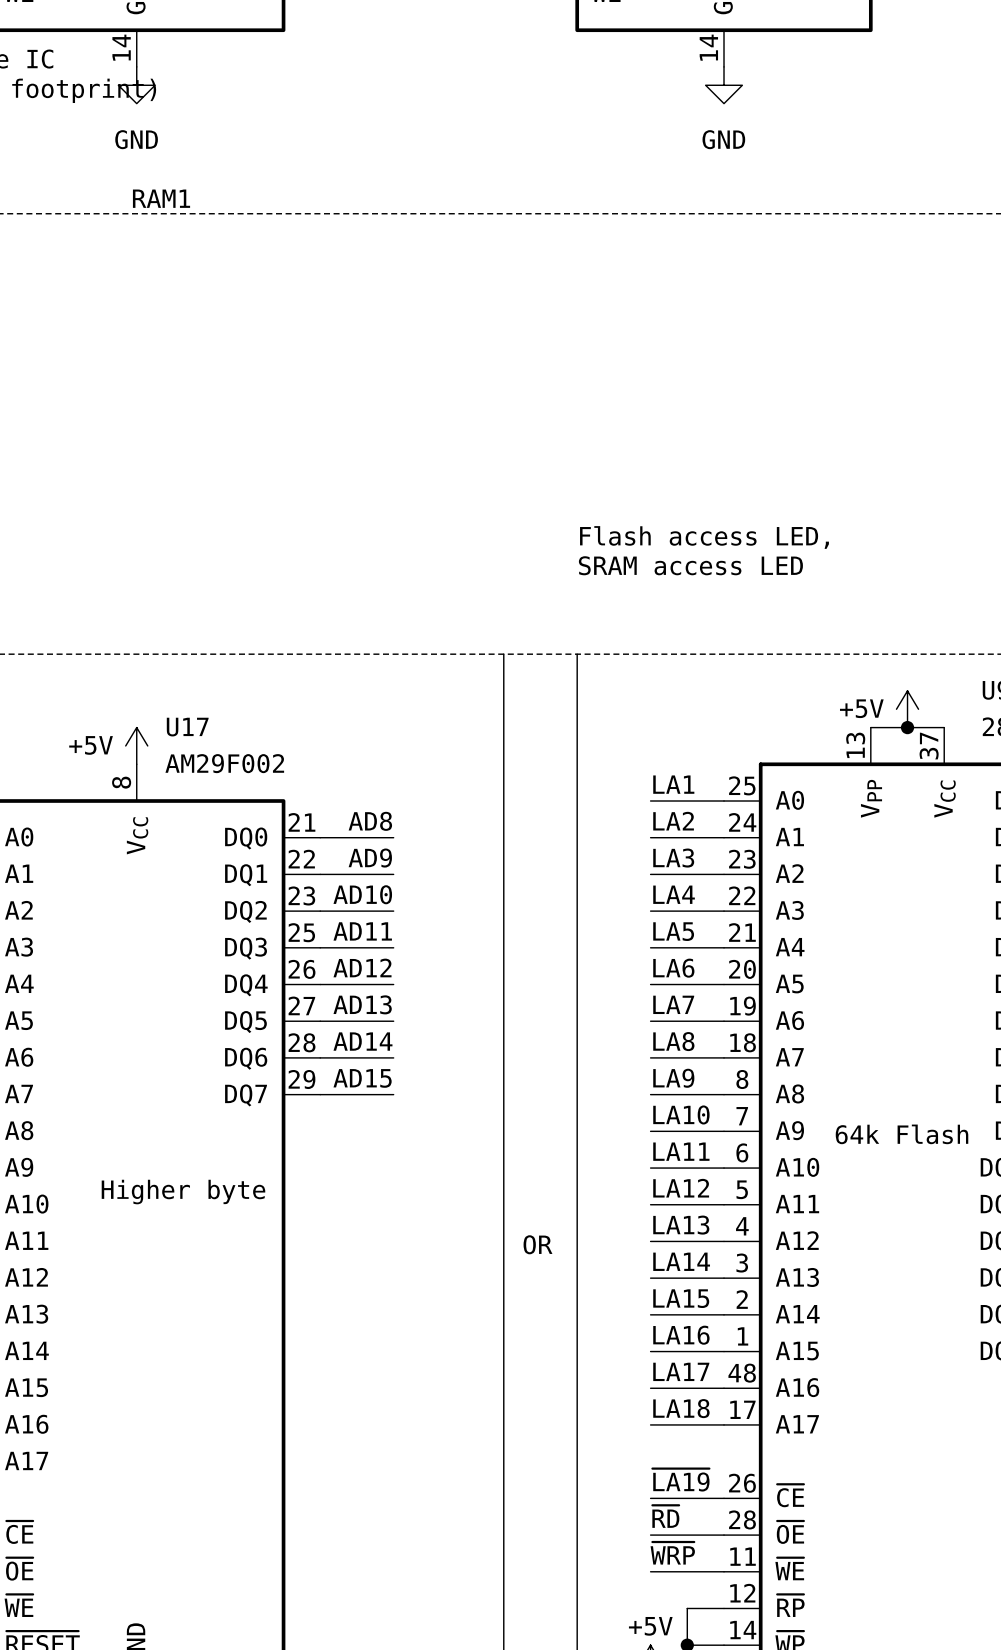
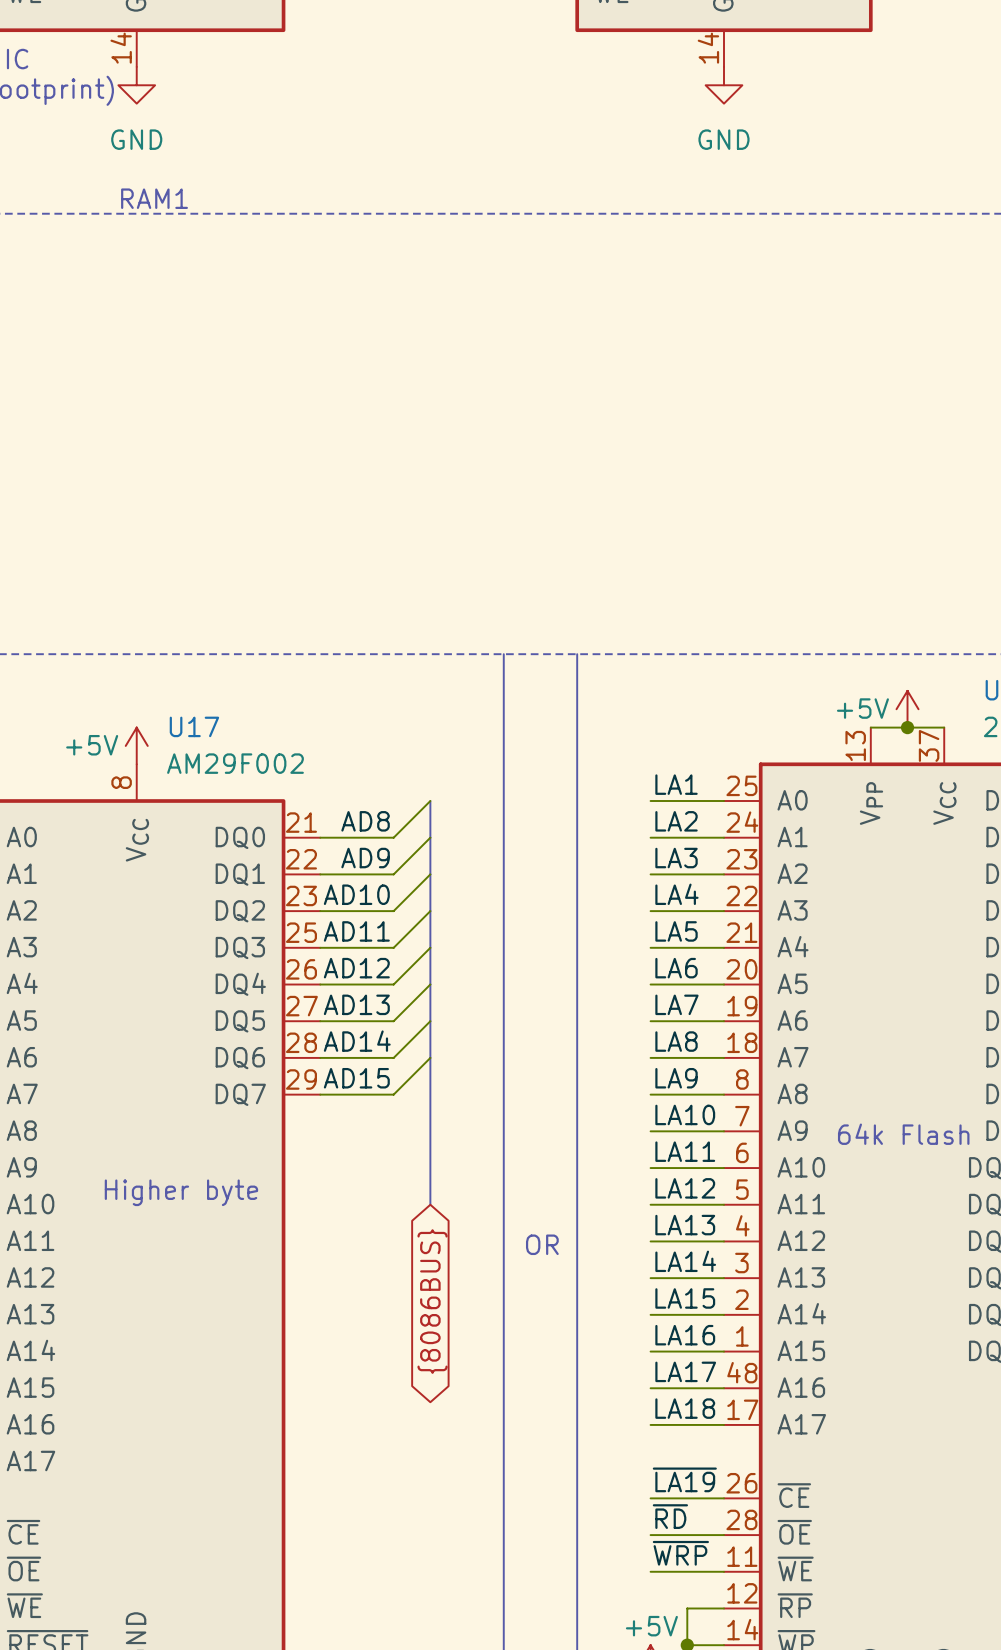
text: Flash access LED, (704, 537) -> none
text: SRAM access LED (690, 565) -> none
wire: none -> (430, 801) (393, 837)
bus: none -> (430, 801) (430, 1204)
wire: none -> (430, 837) (393, 874)
wire: none -> (430, 874) (393, 911)
wire: none -> (430, 911) (393, 947)
wire: none -> (430, 947) (393, 984)
wire: none -> (430, 984) (393, 1021)
wire: none -> (430, 1021) (393, 1057)
wire: none -> (430, 1057) (393, 1094)
global label: none -> {8086BUS} (432, 1301)

